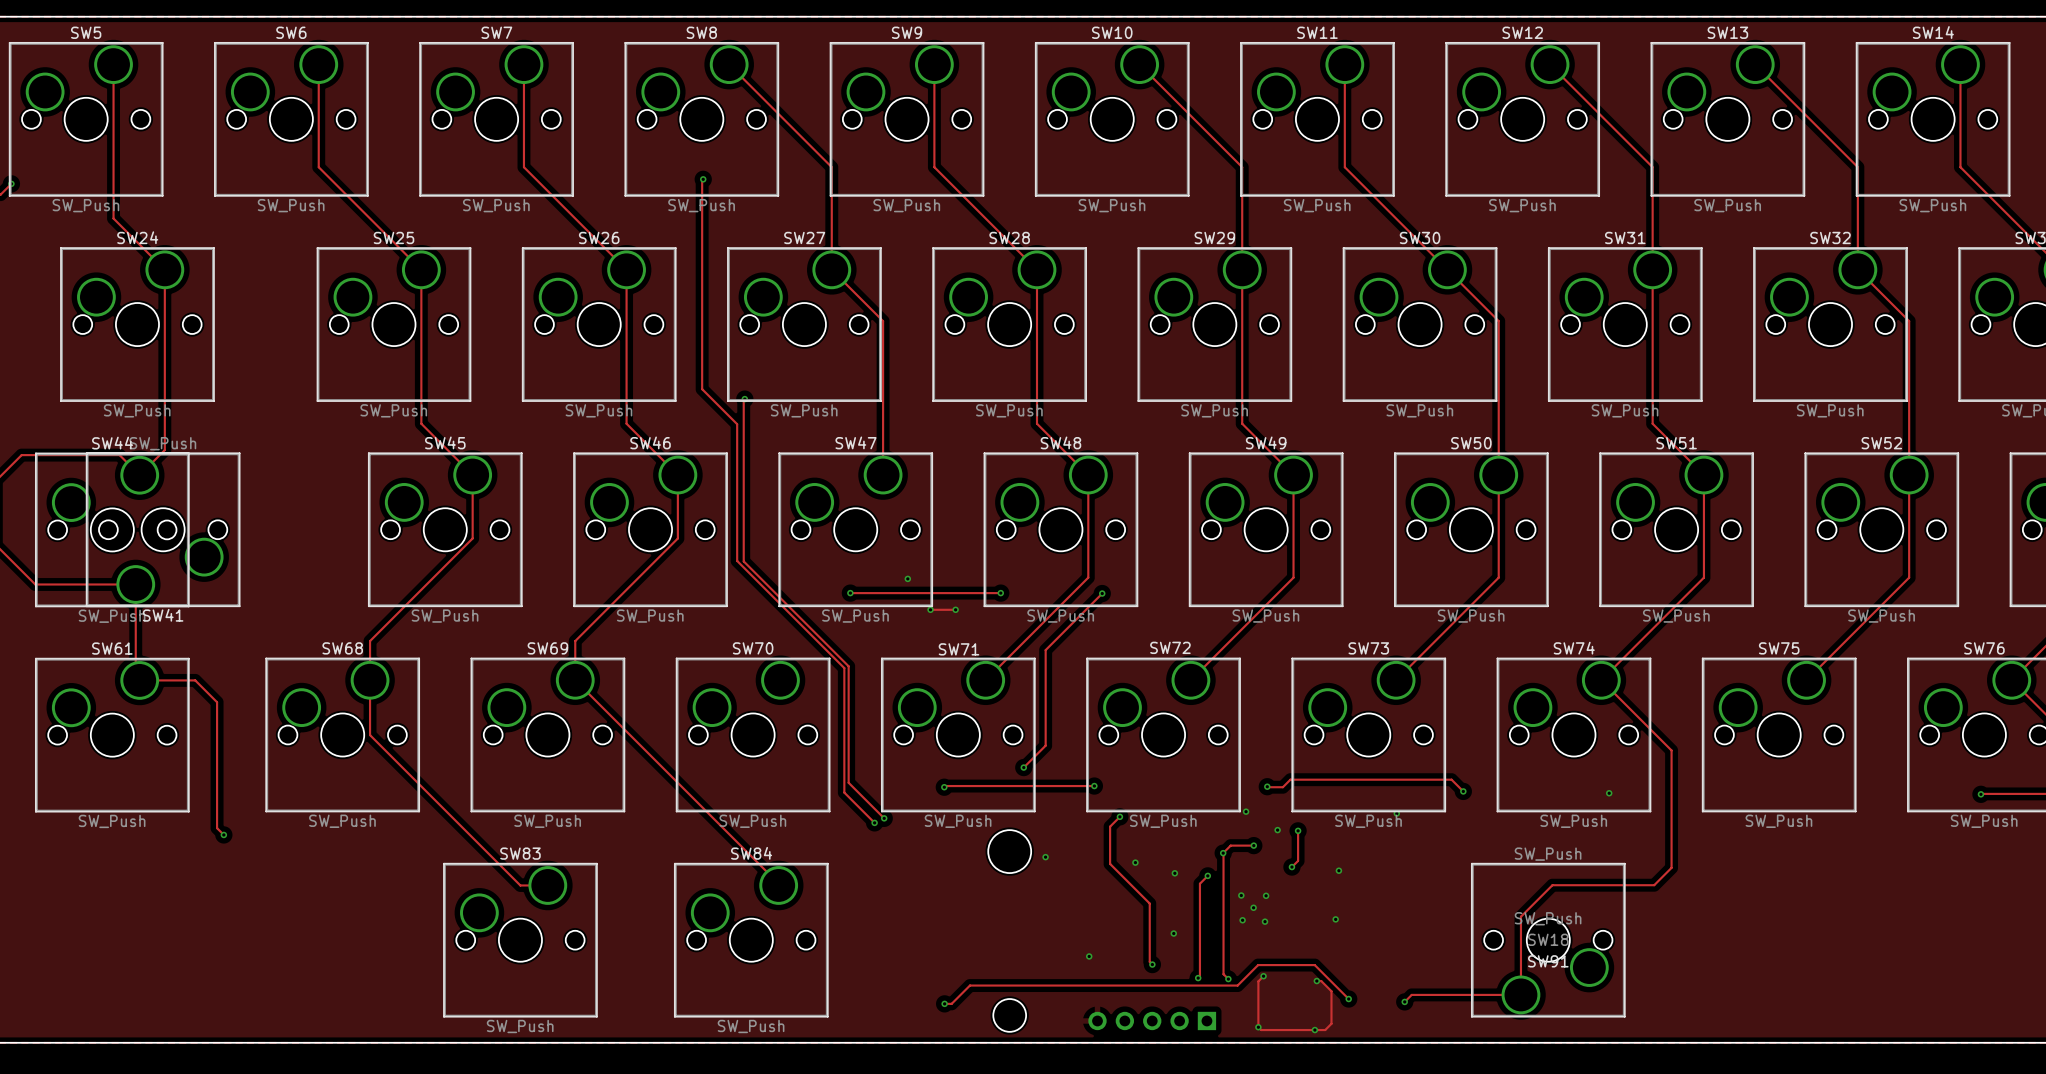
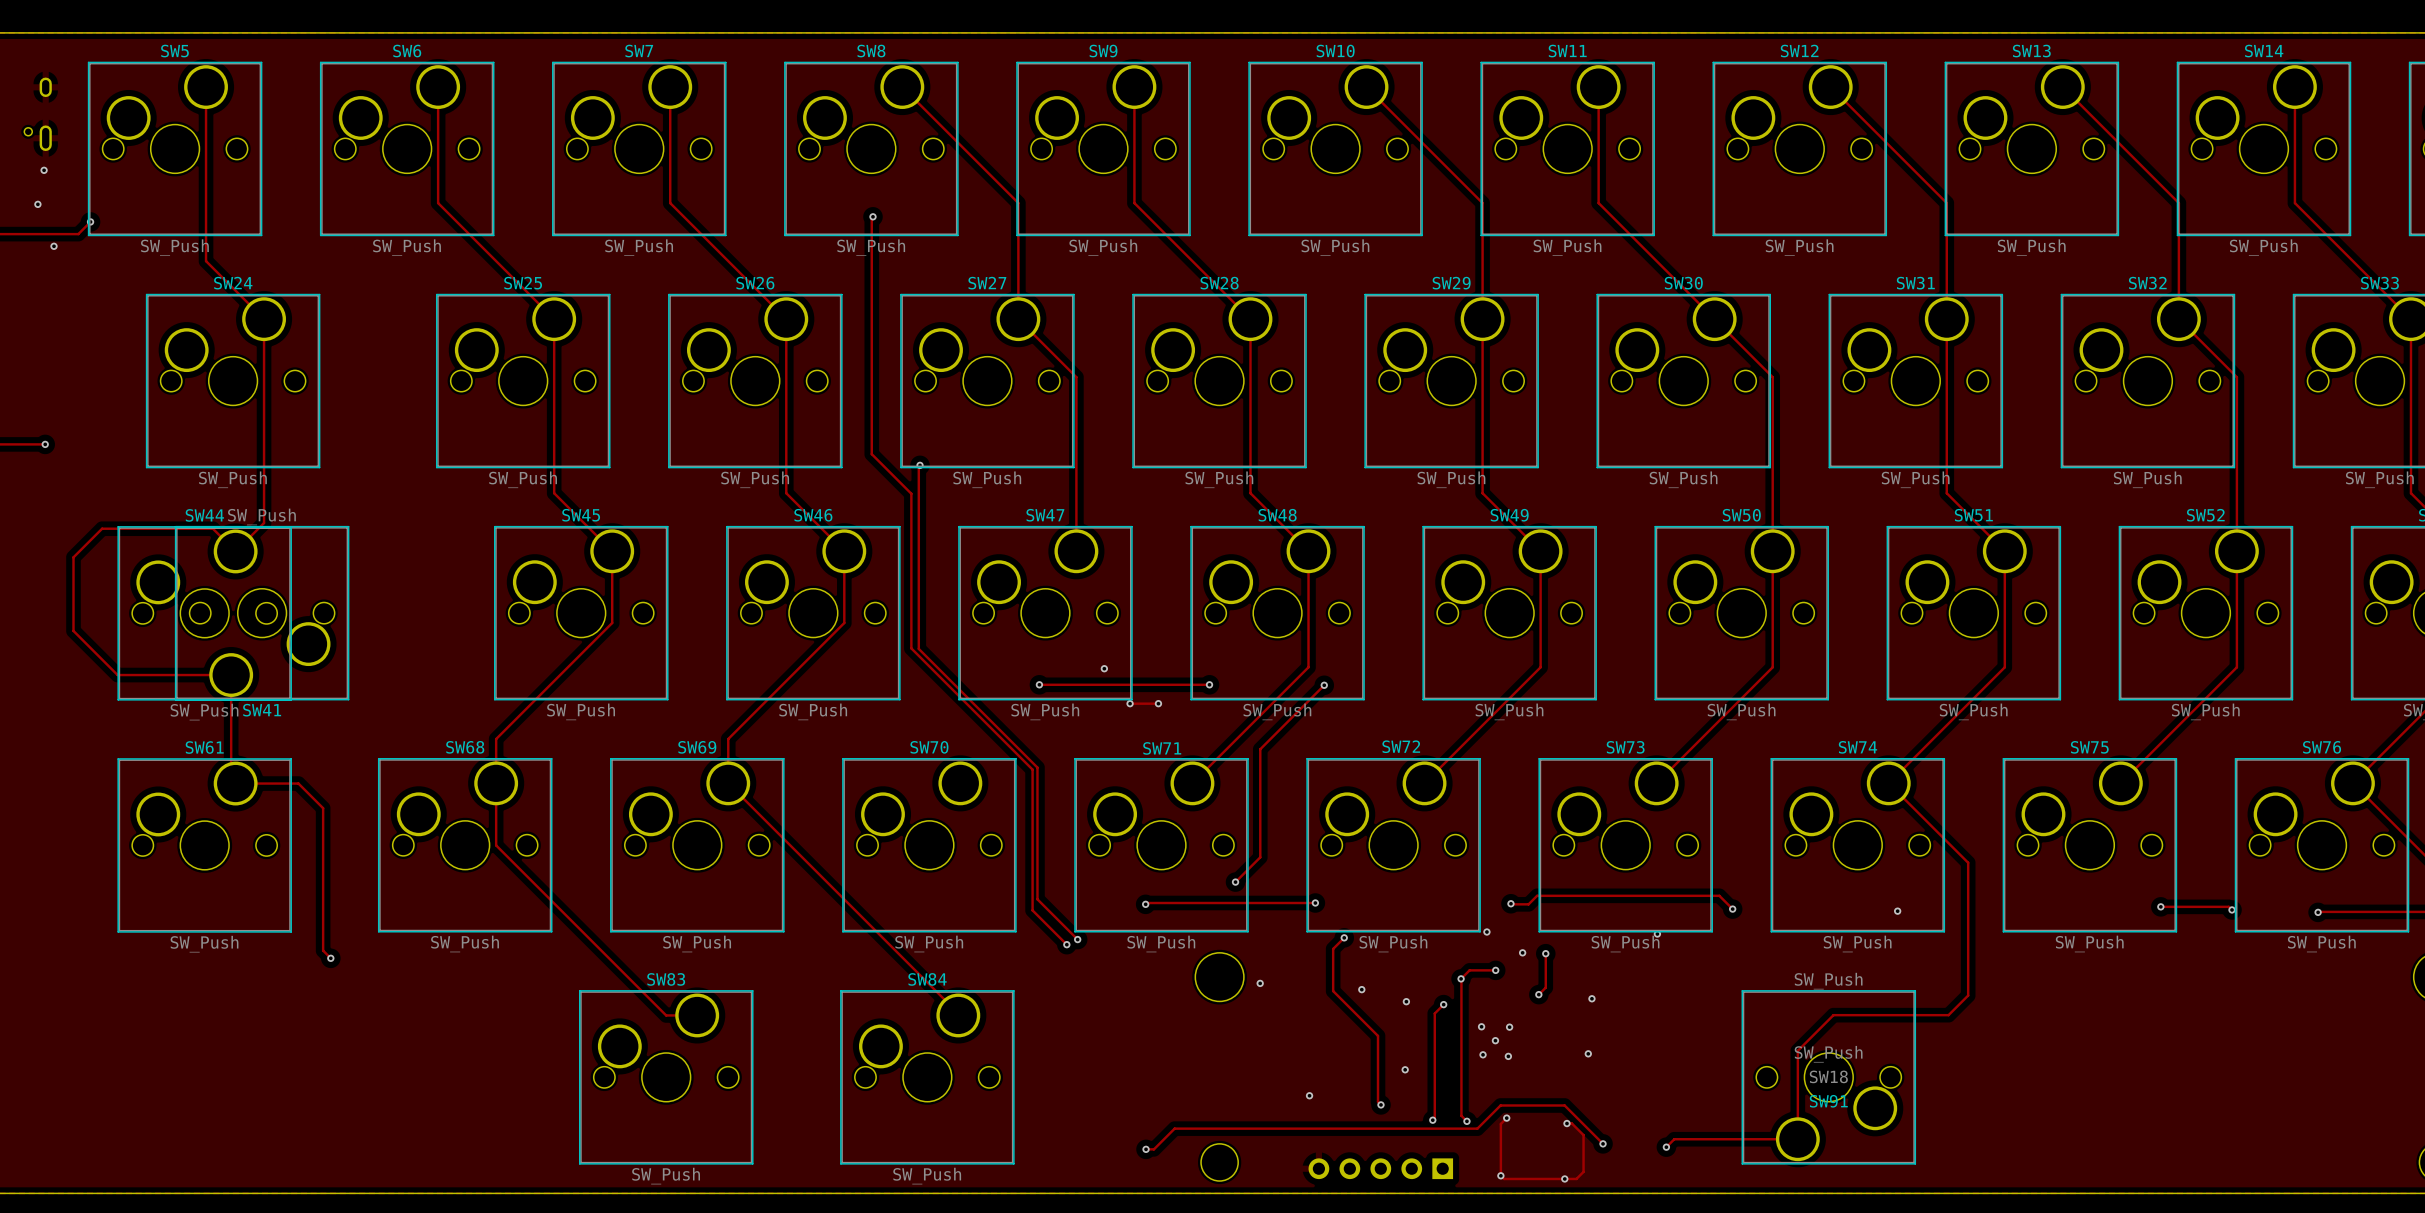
track: none -> (2160, 906) (2228, 906) (2232, 909)
via: none -> (2160, 906)
via: none -> (2232, 909)

